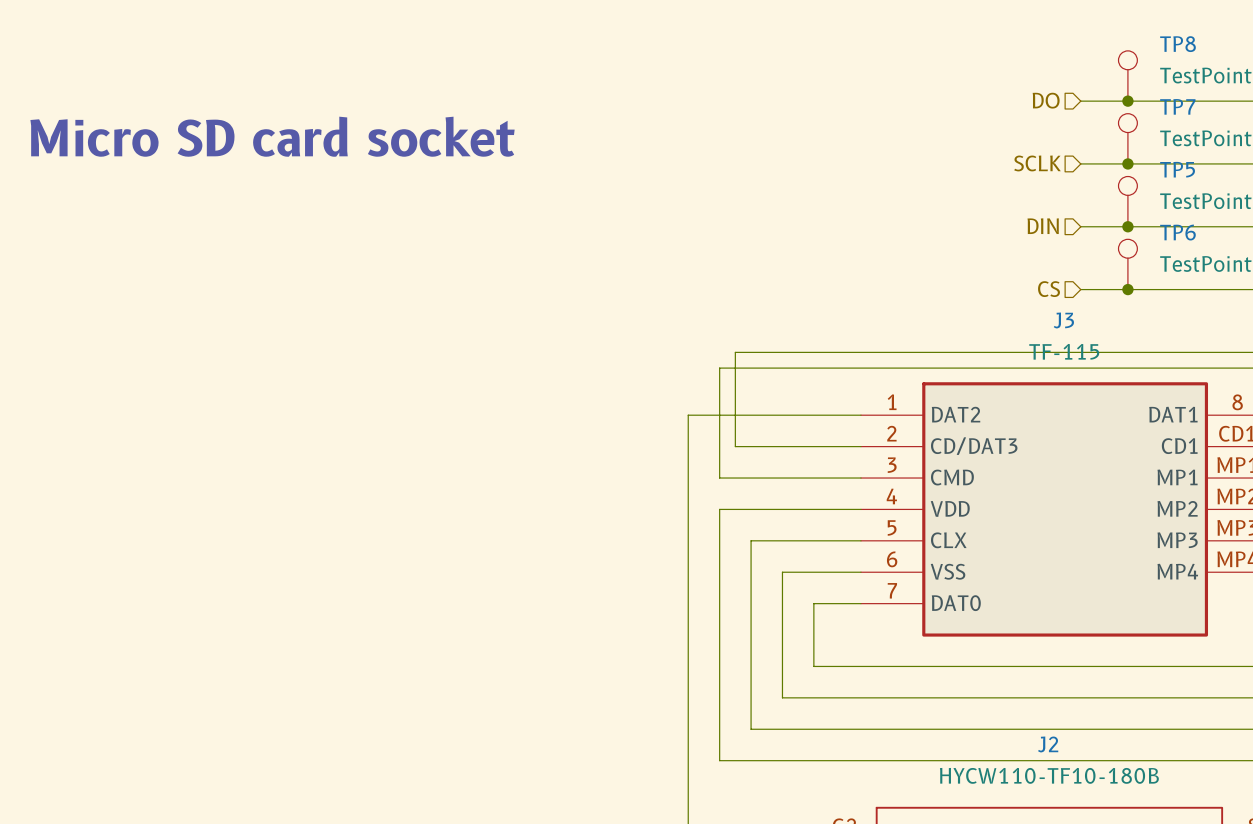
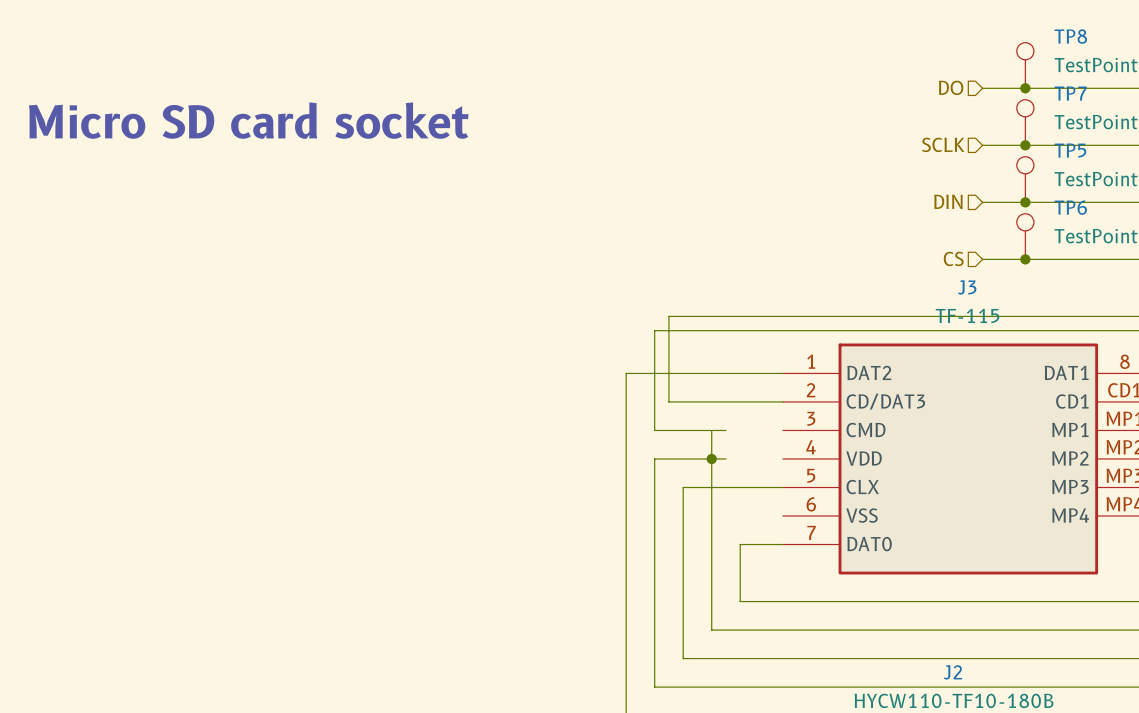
wire: (798, 478) (860, 478) -> none
junction: none -> (711, 458)
wire: (798, 509) (860, 509) -> none
wire: (782, 572) (860, 572) -> (711, 516) (711, 430)

